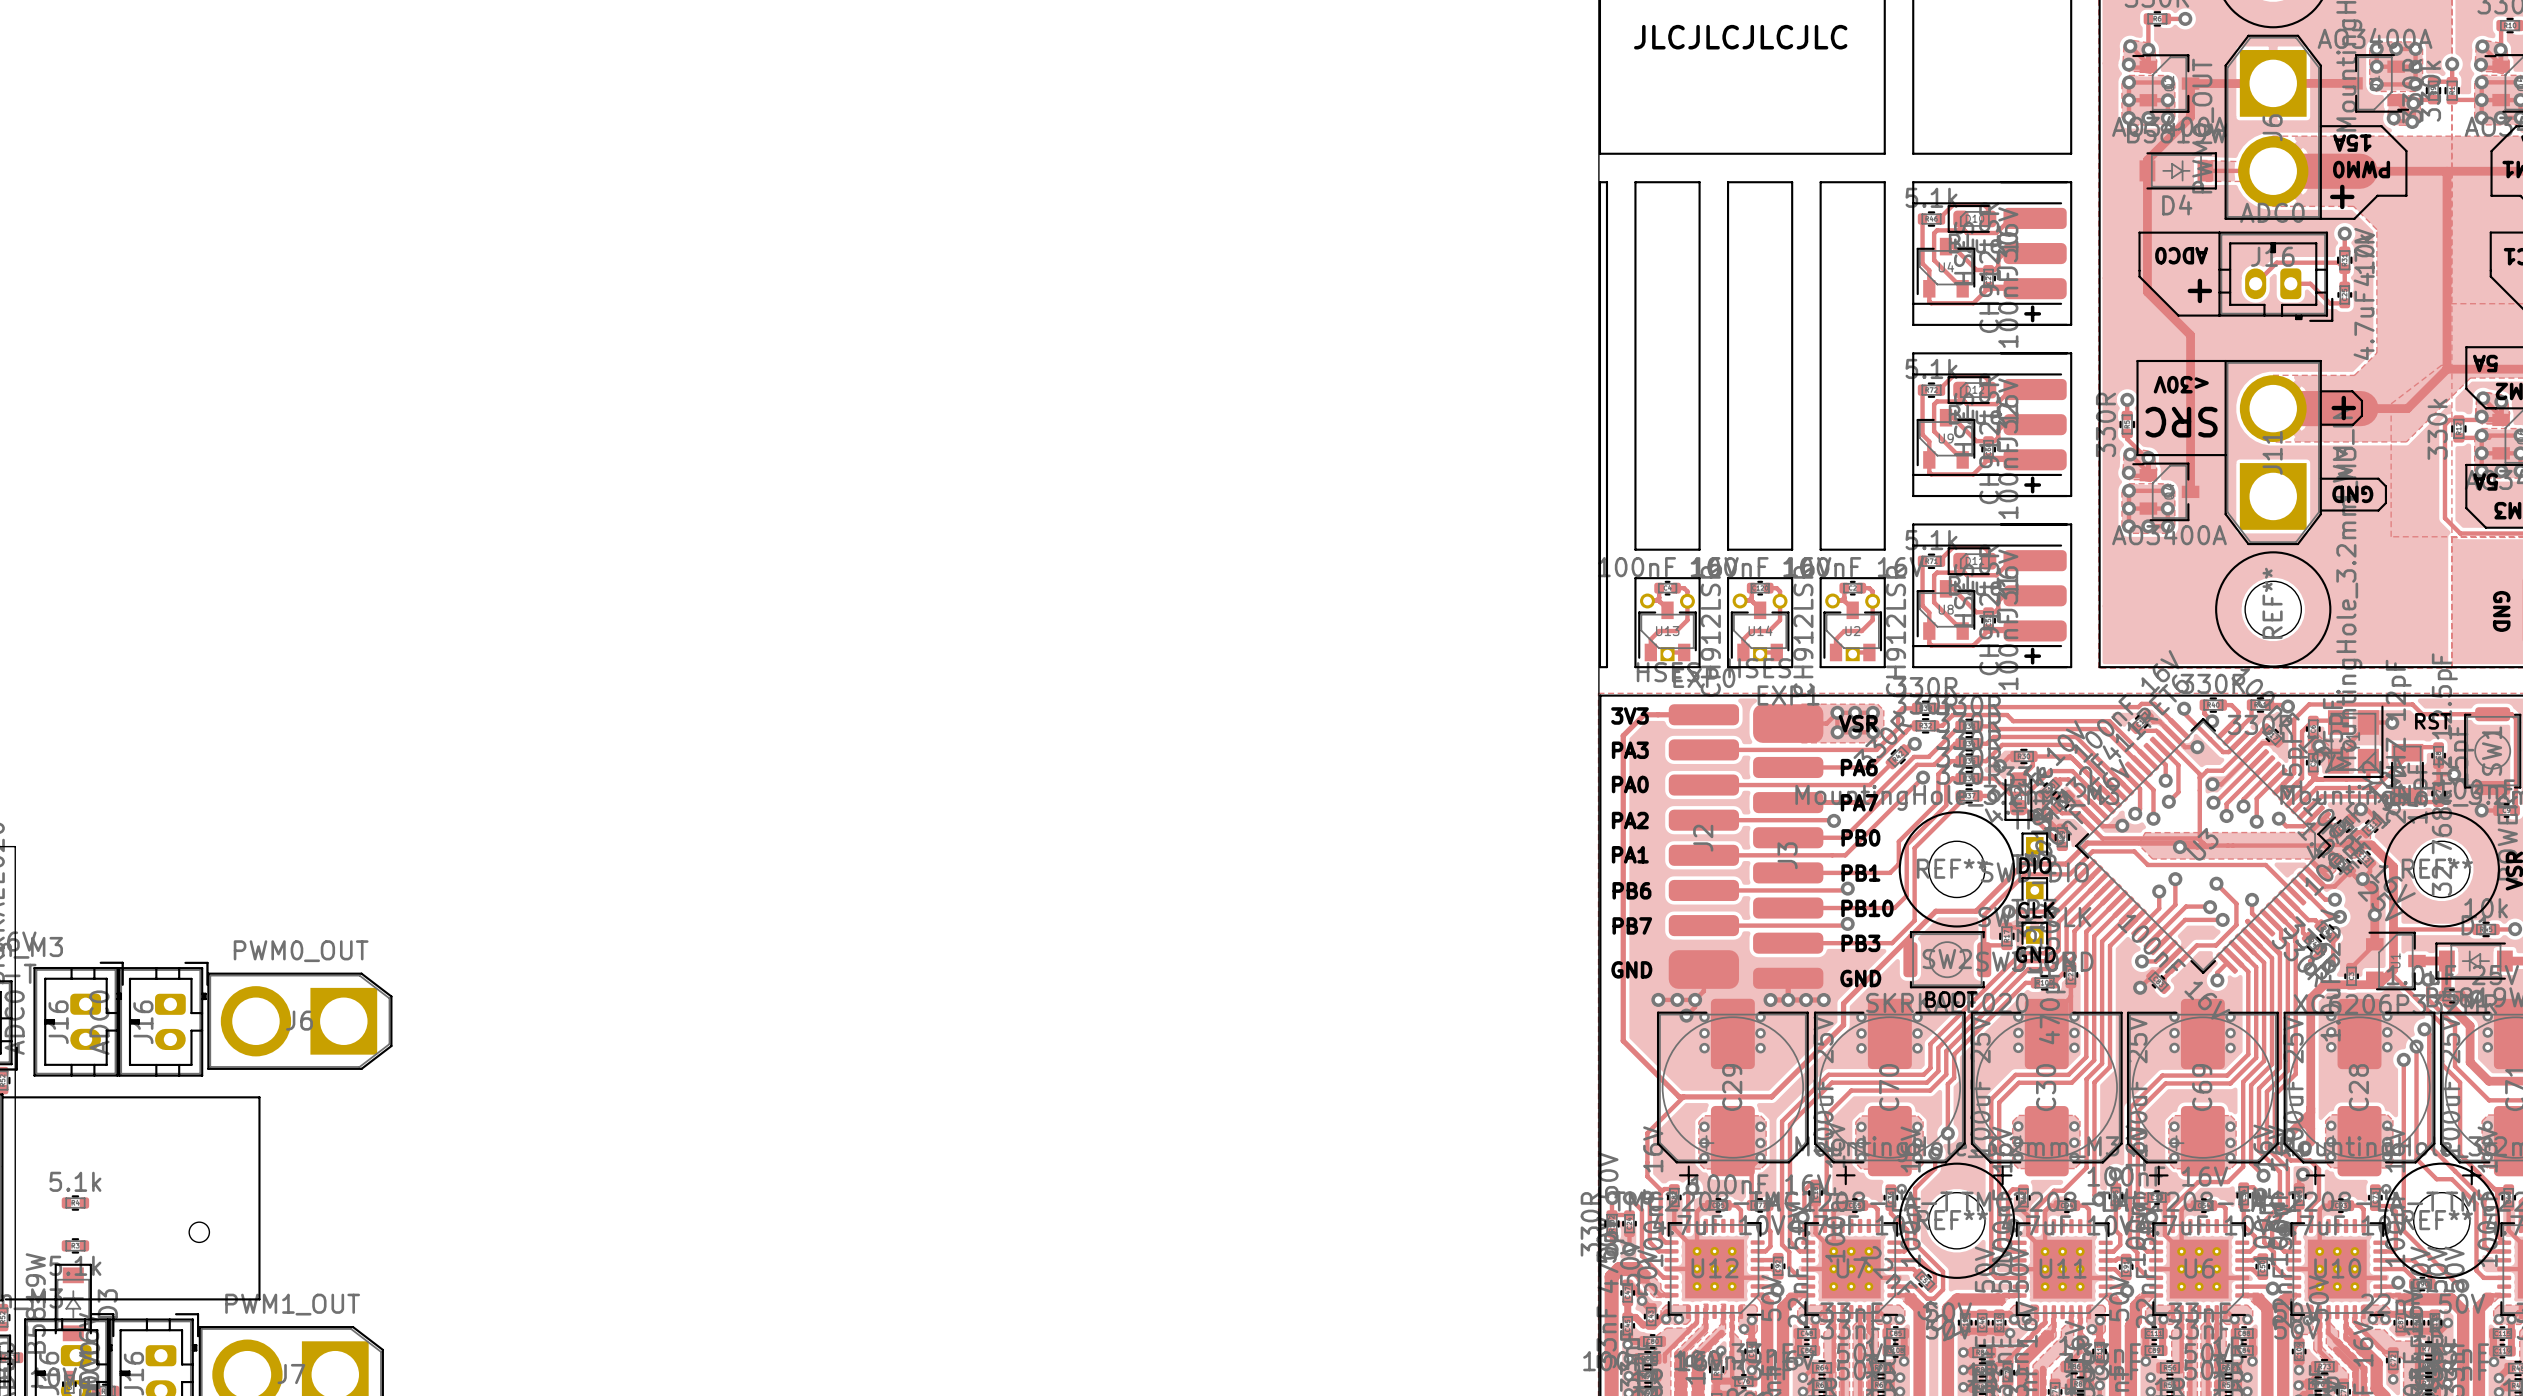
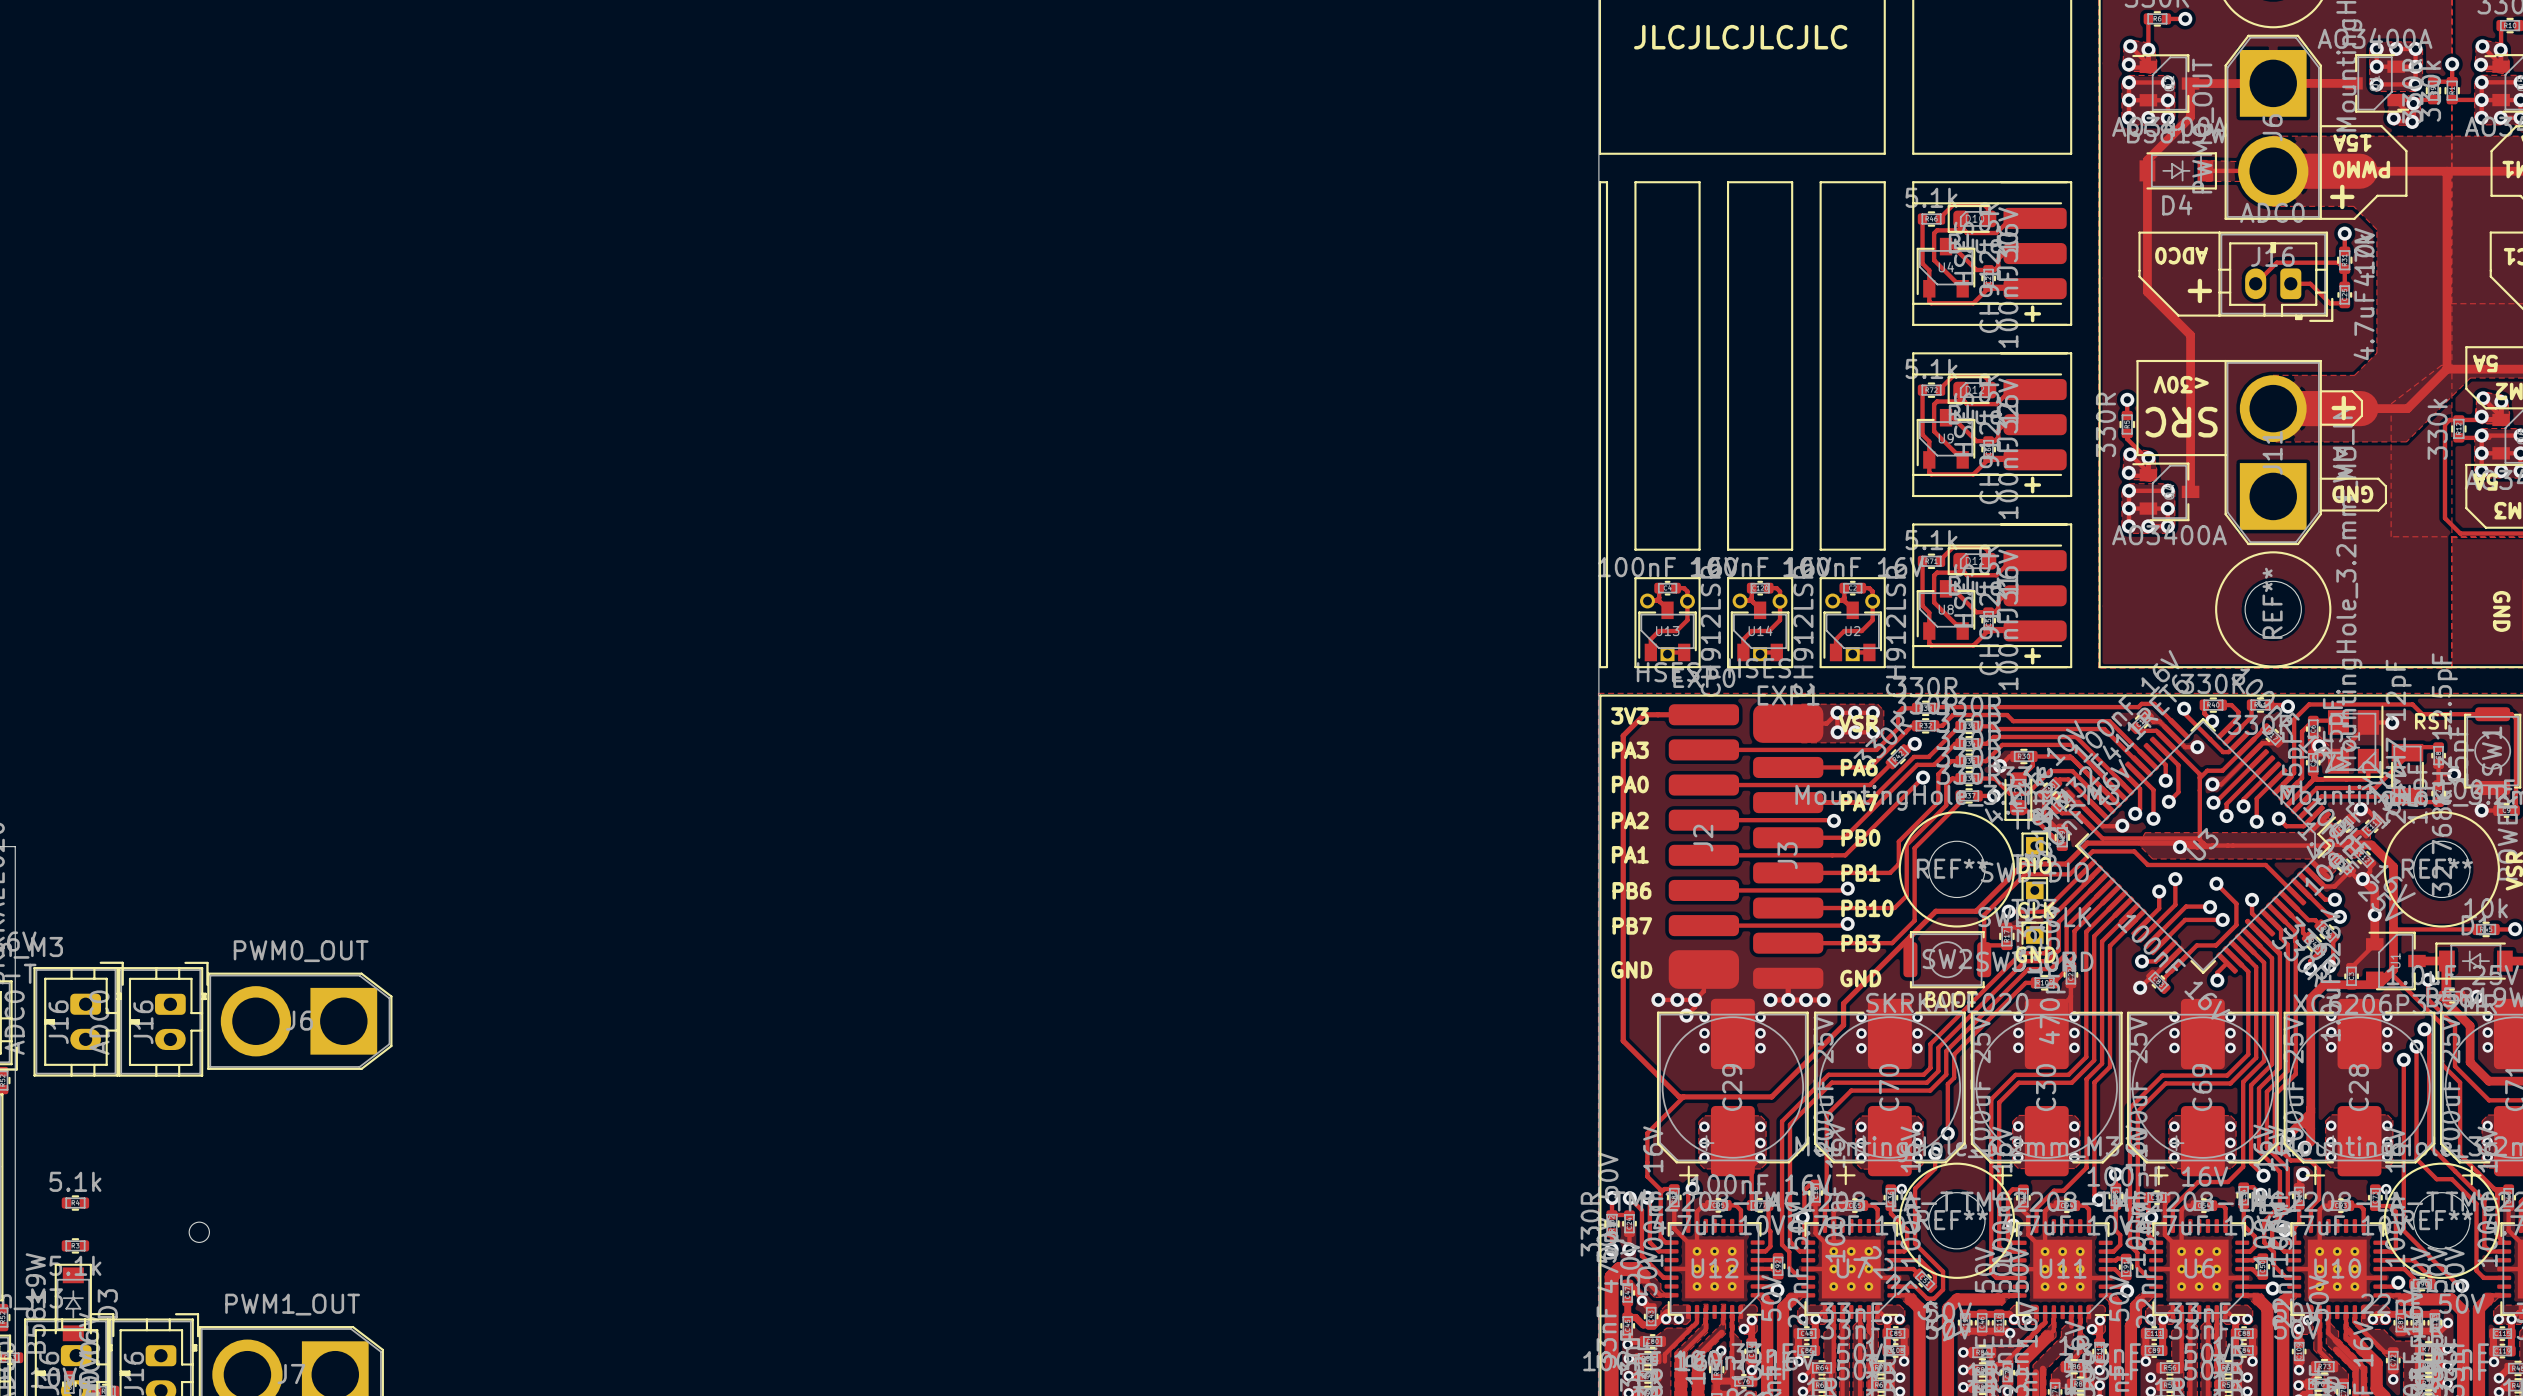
line: (3, 1097) (259, 1097) (259, 1299) (5, 1299) -> none

